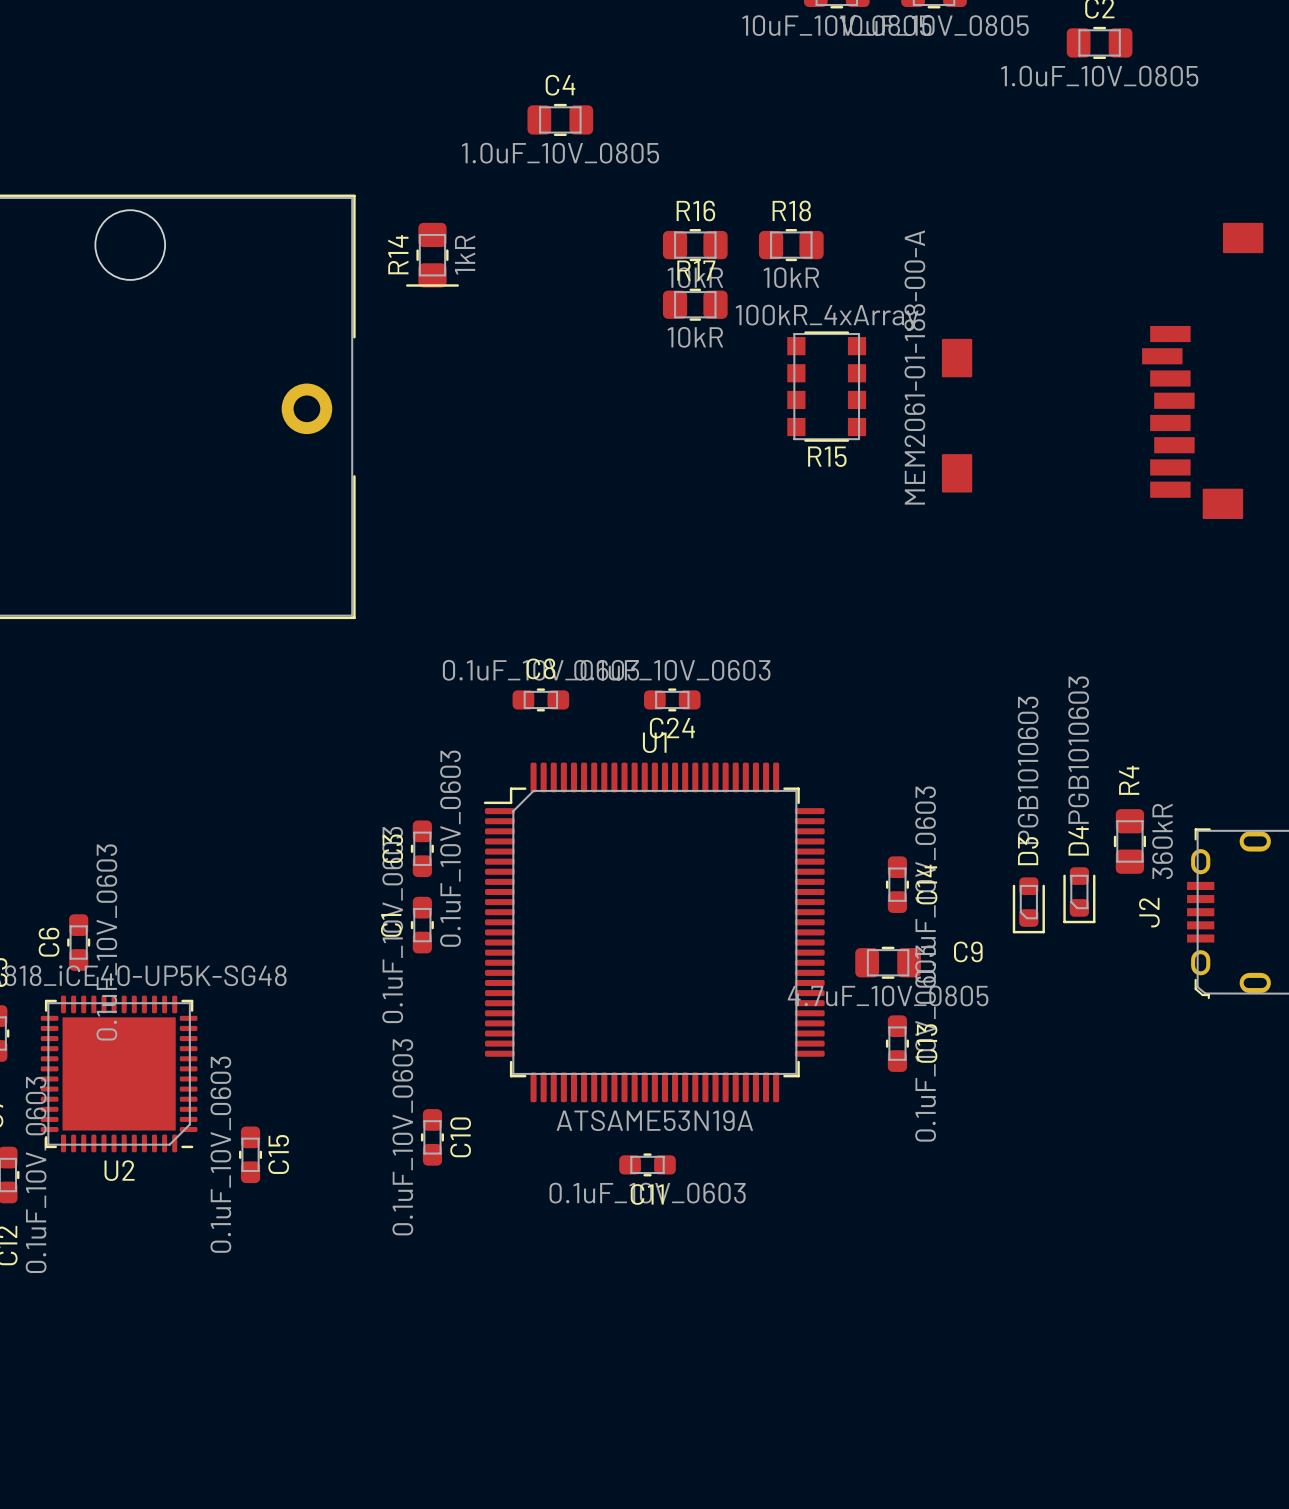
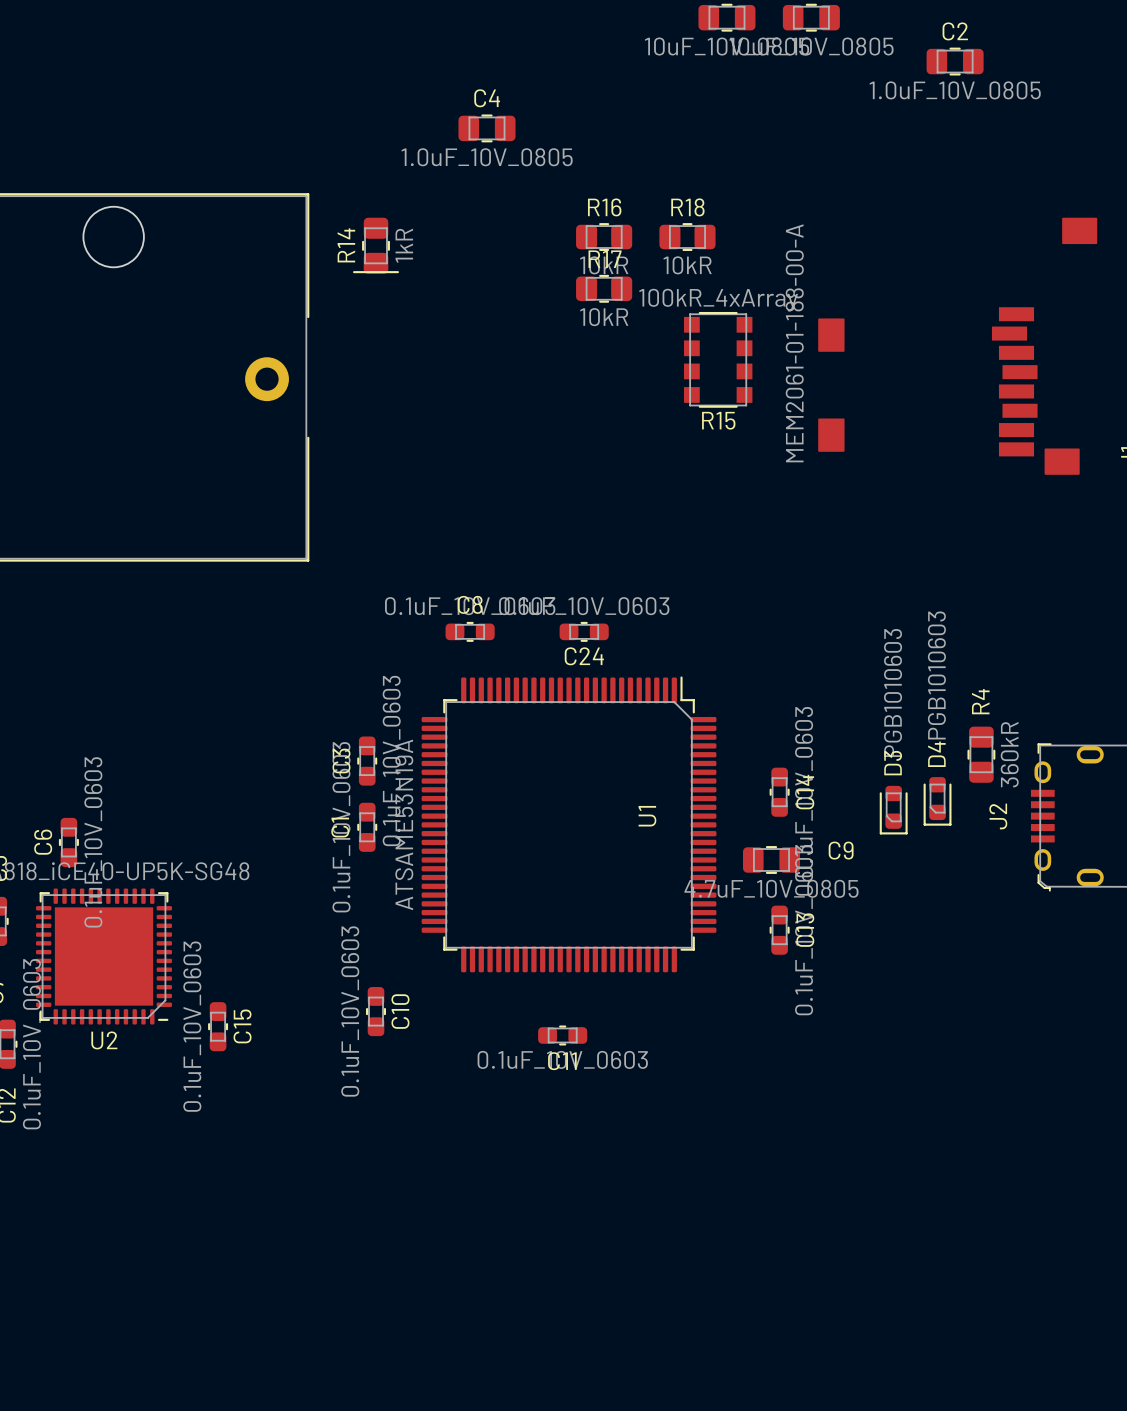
U1 name position: U1 (654, 742) -> U1 (647, 816)
U1 rotation: 0° (654, 932) -> 90° clockwise (569, 824)

